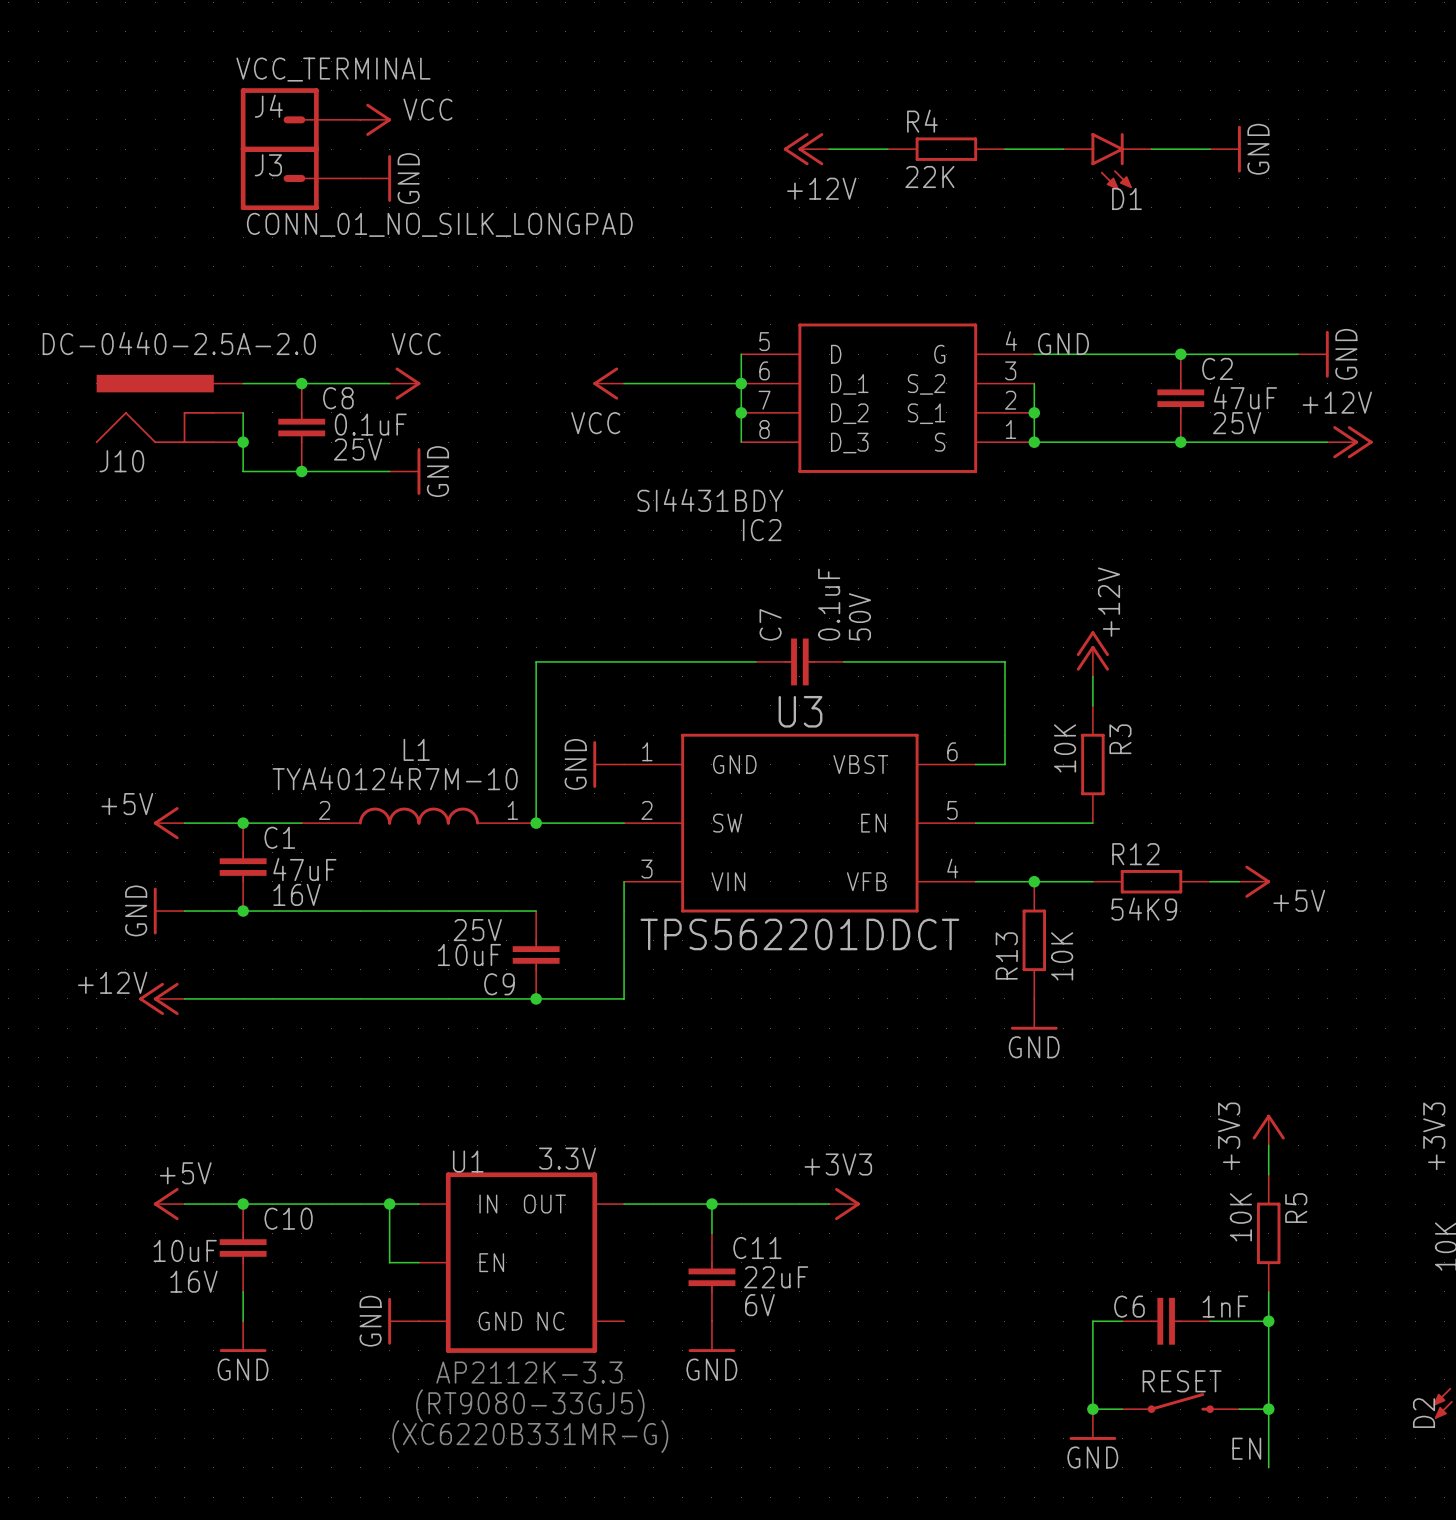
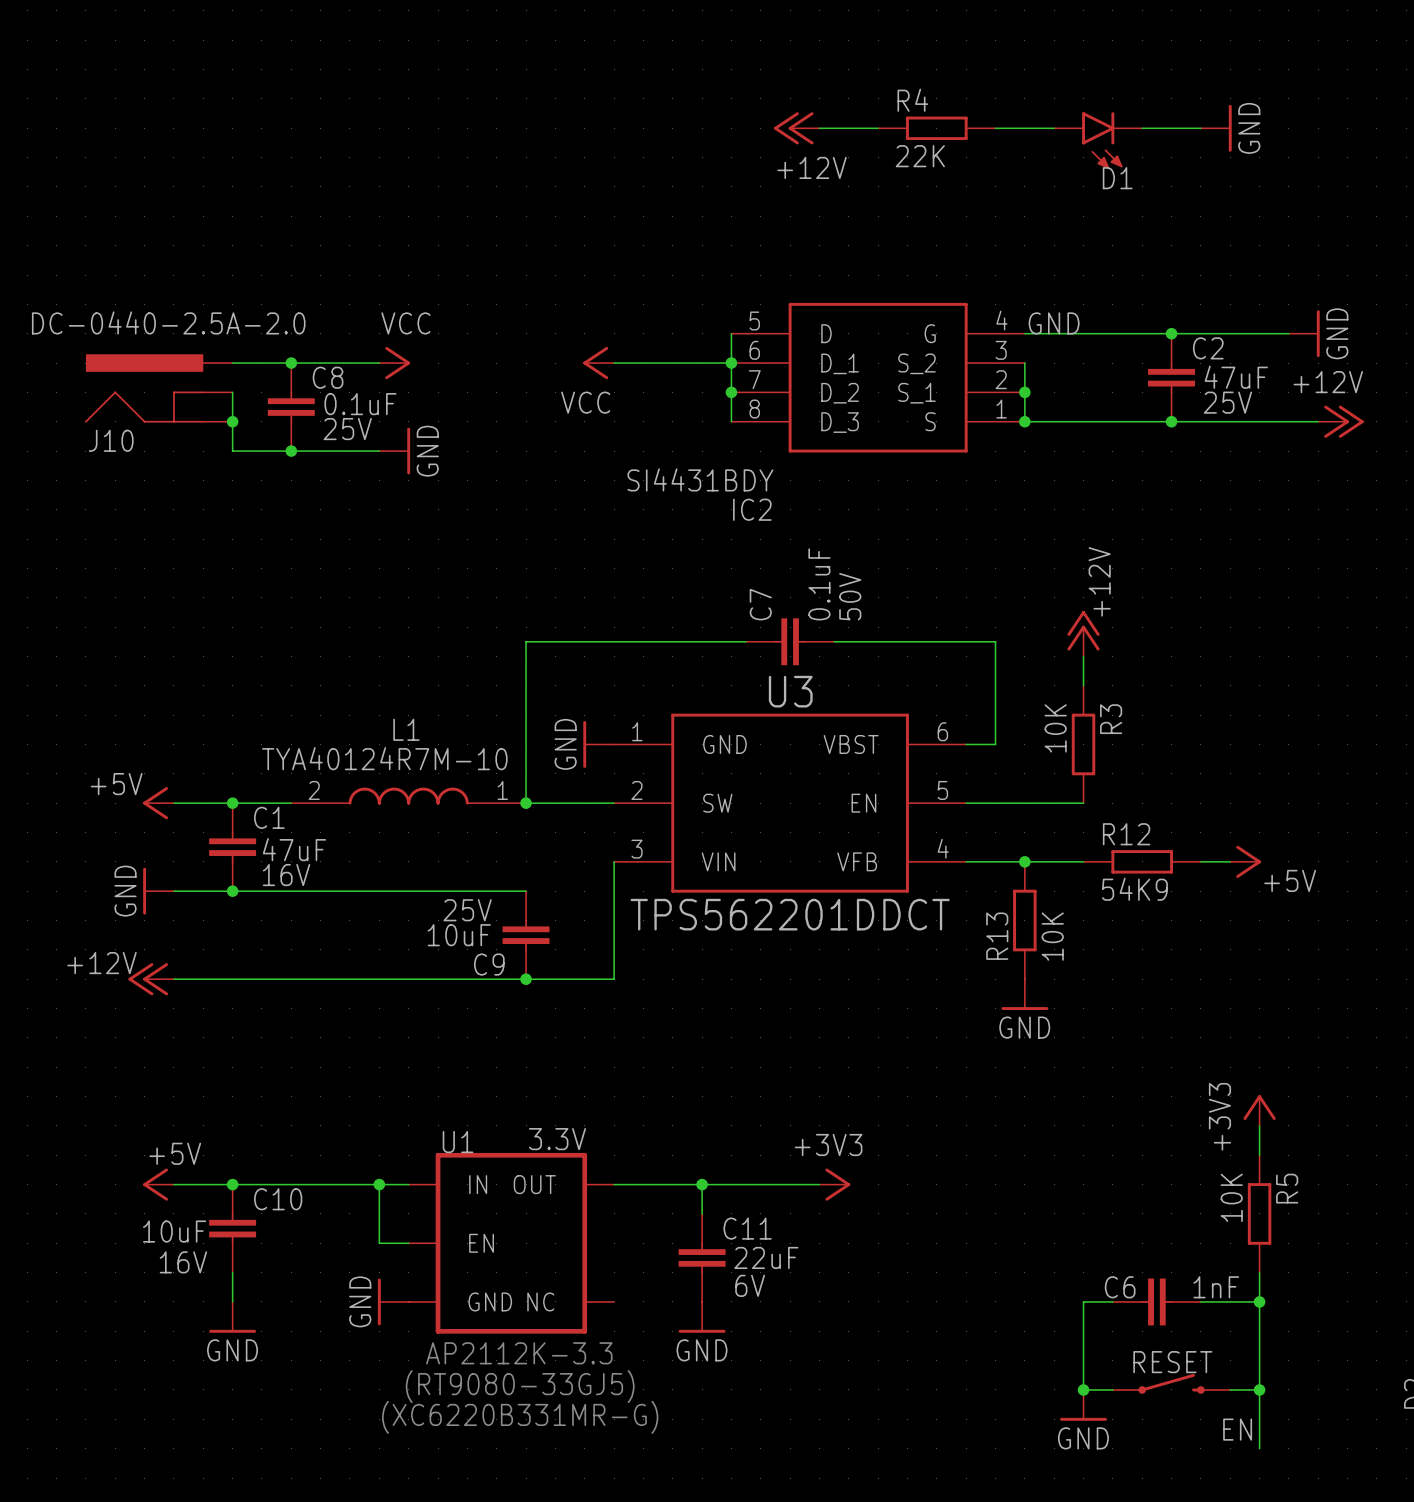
J4: VCC_TERMINAL (300, 119) -> none
power symbol: VCC (375, 119) -> none
J3: CONN_01_NO_SILK_LONGPAD (300, 178) -> none
power symbol: GND (375, 178) -> none

